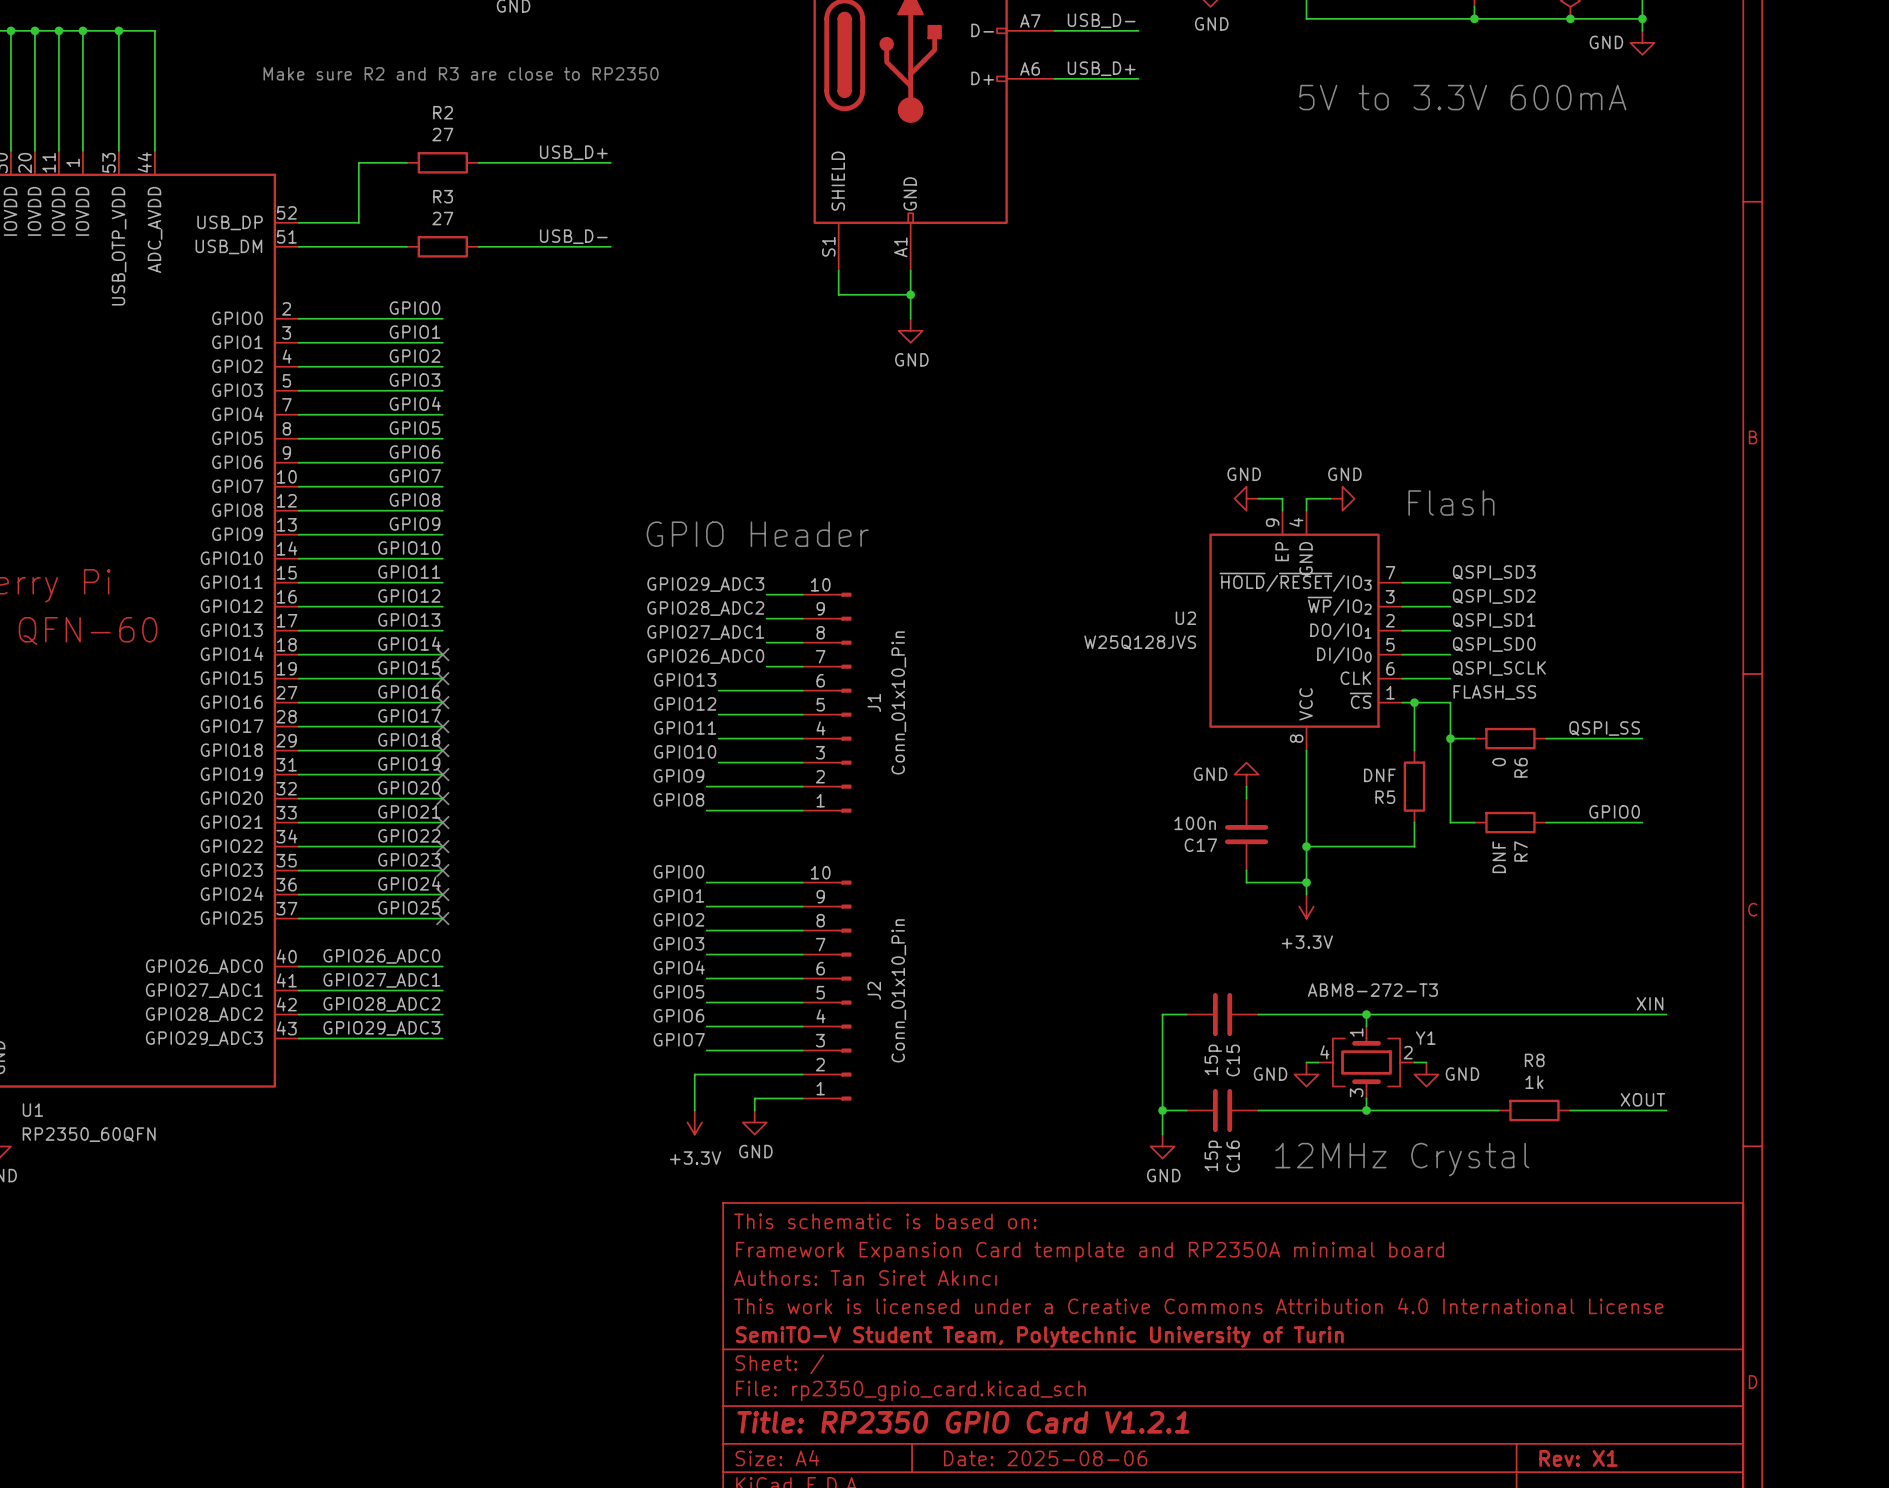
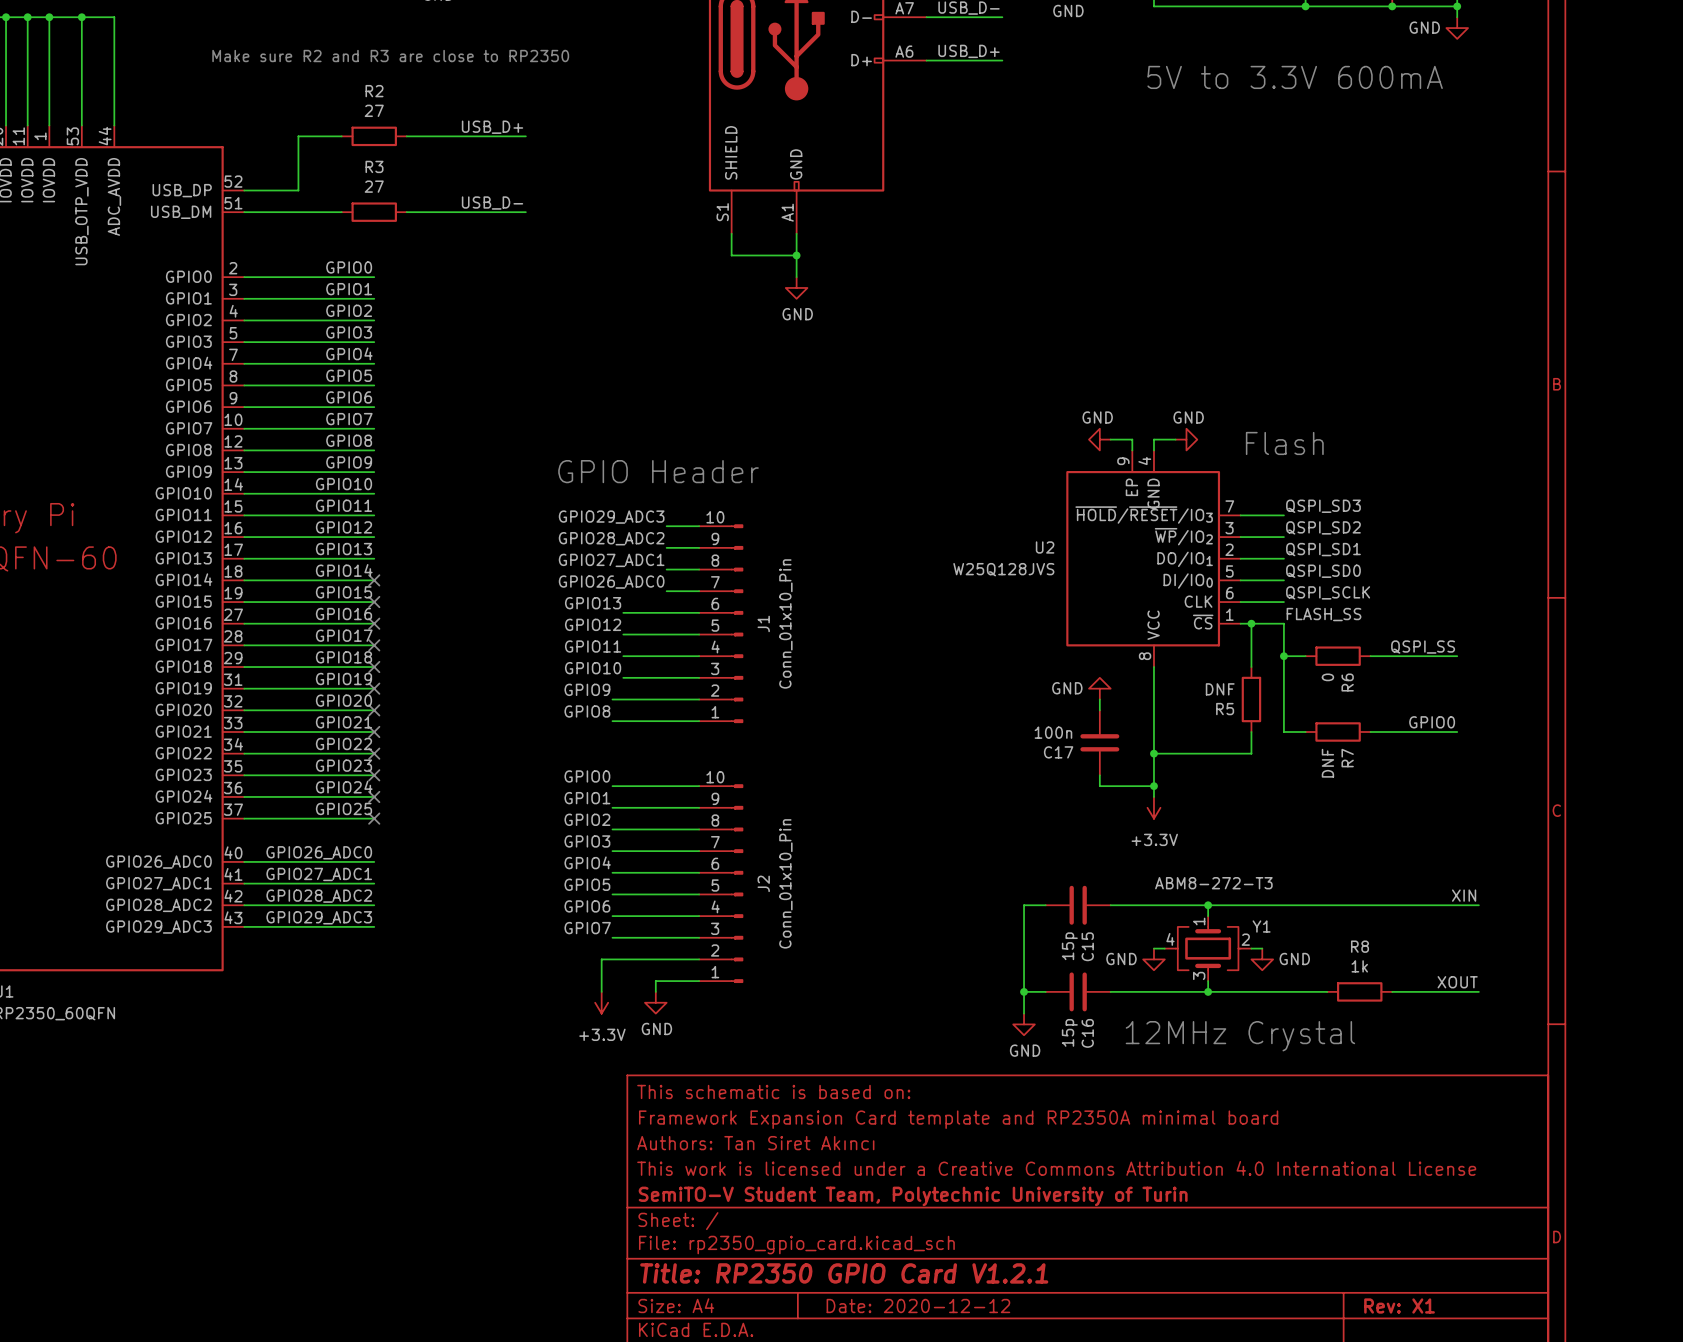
title block: Date: 2025-08-06 (1045, 1458) -> Date: 2020-12-12 (918, 1306)

